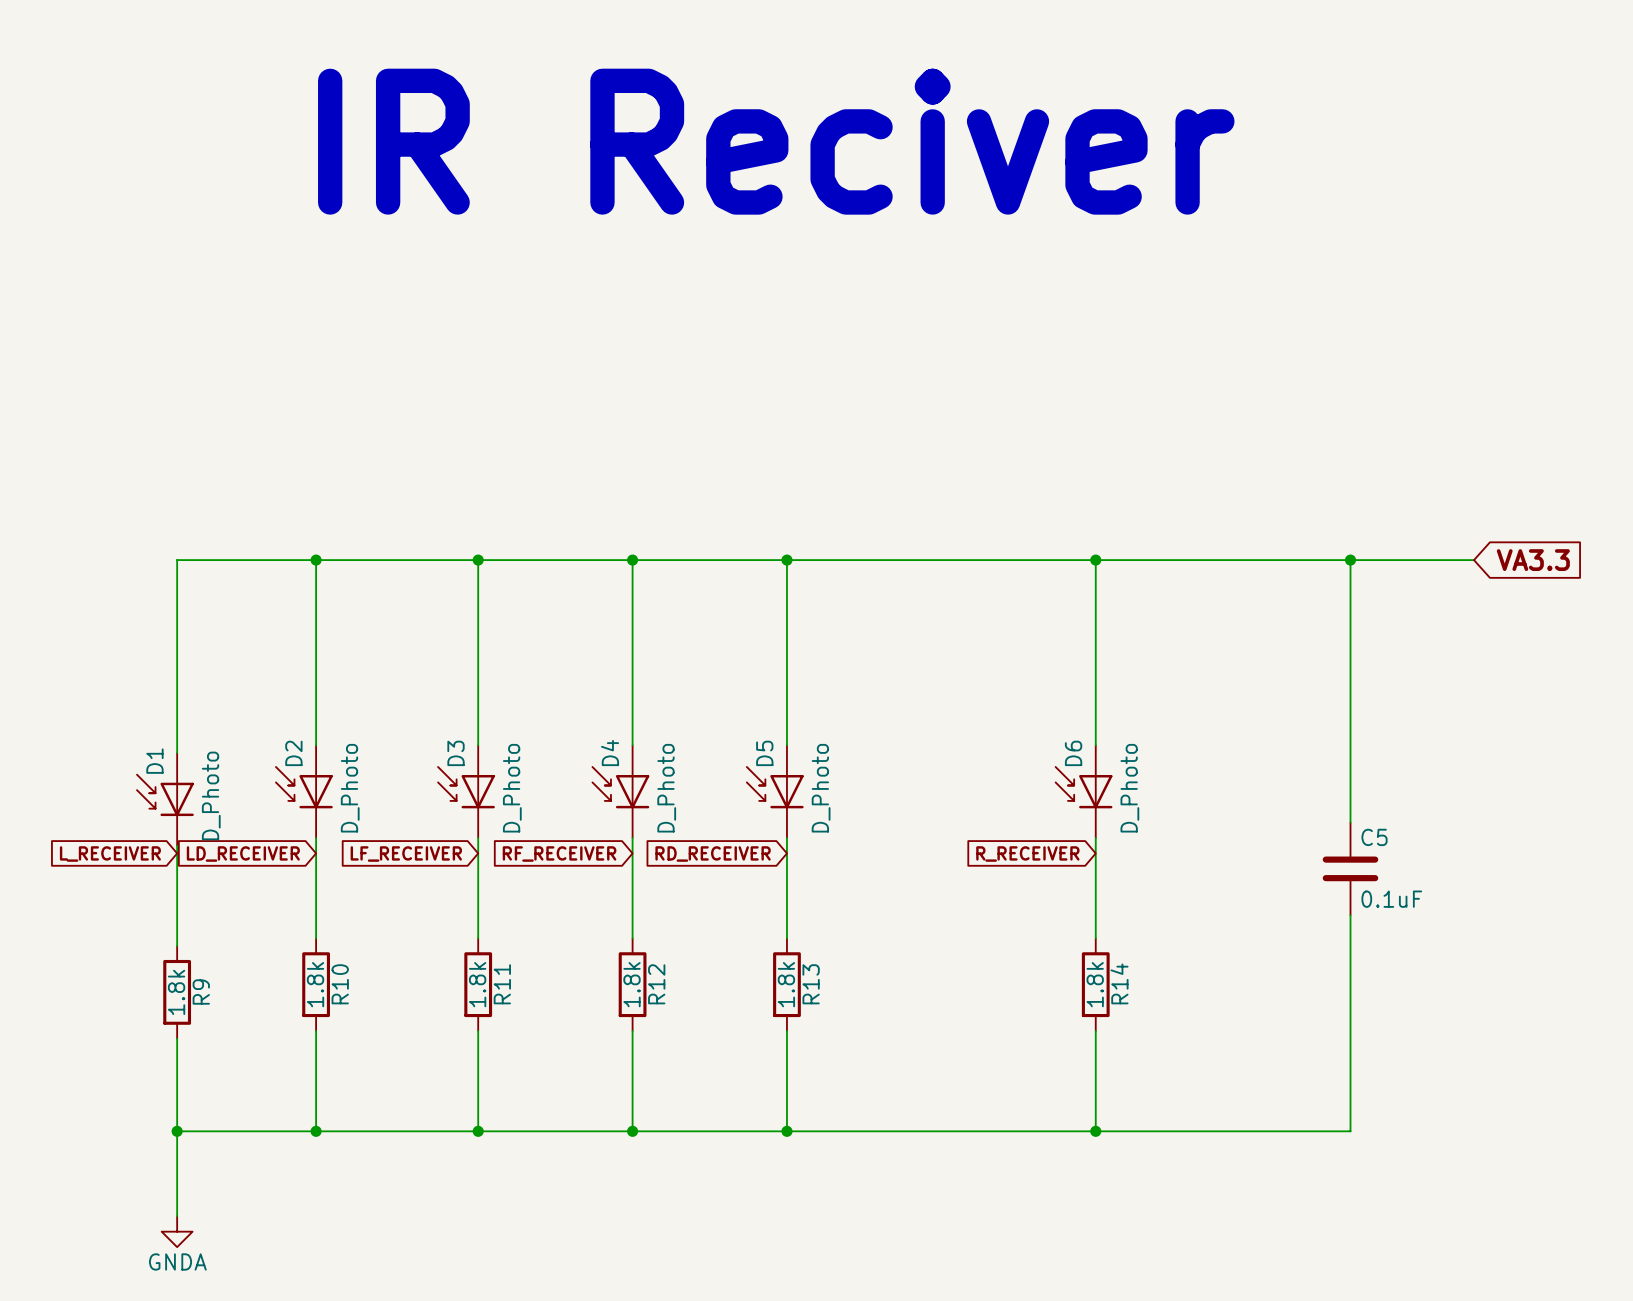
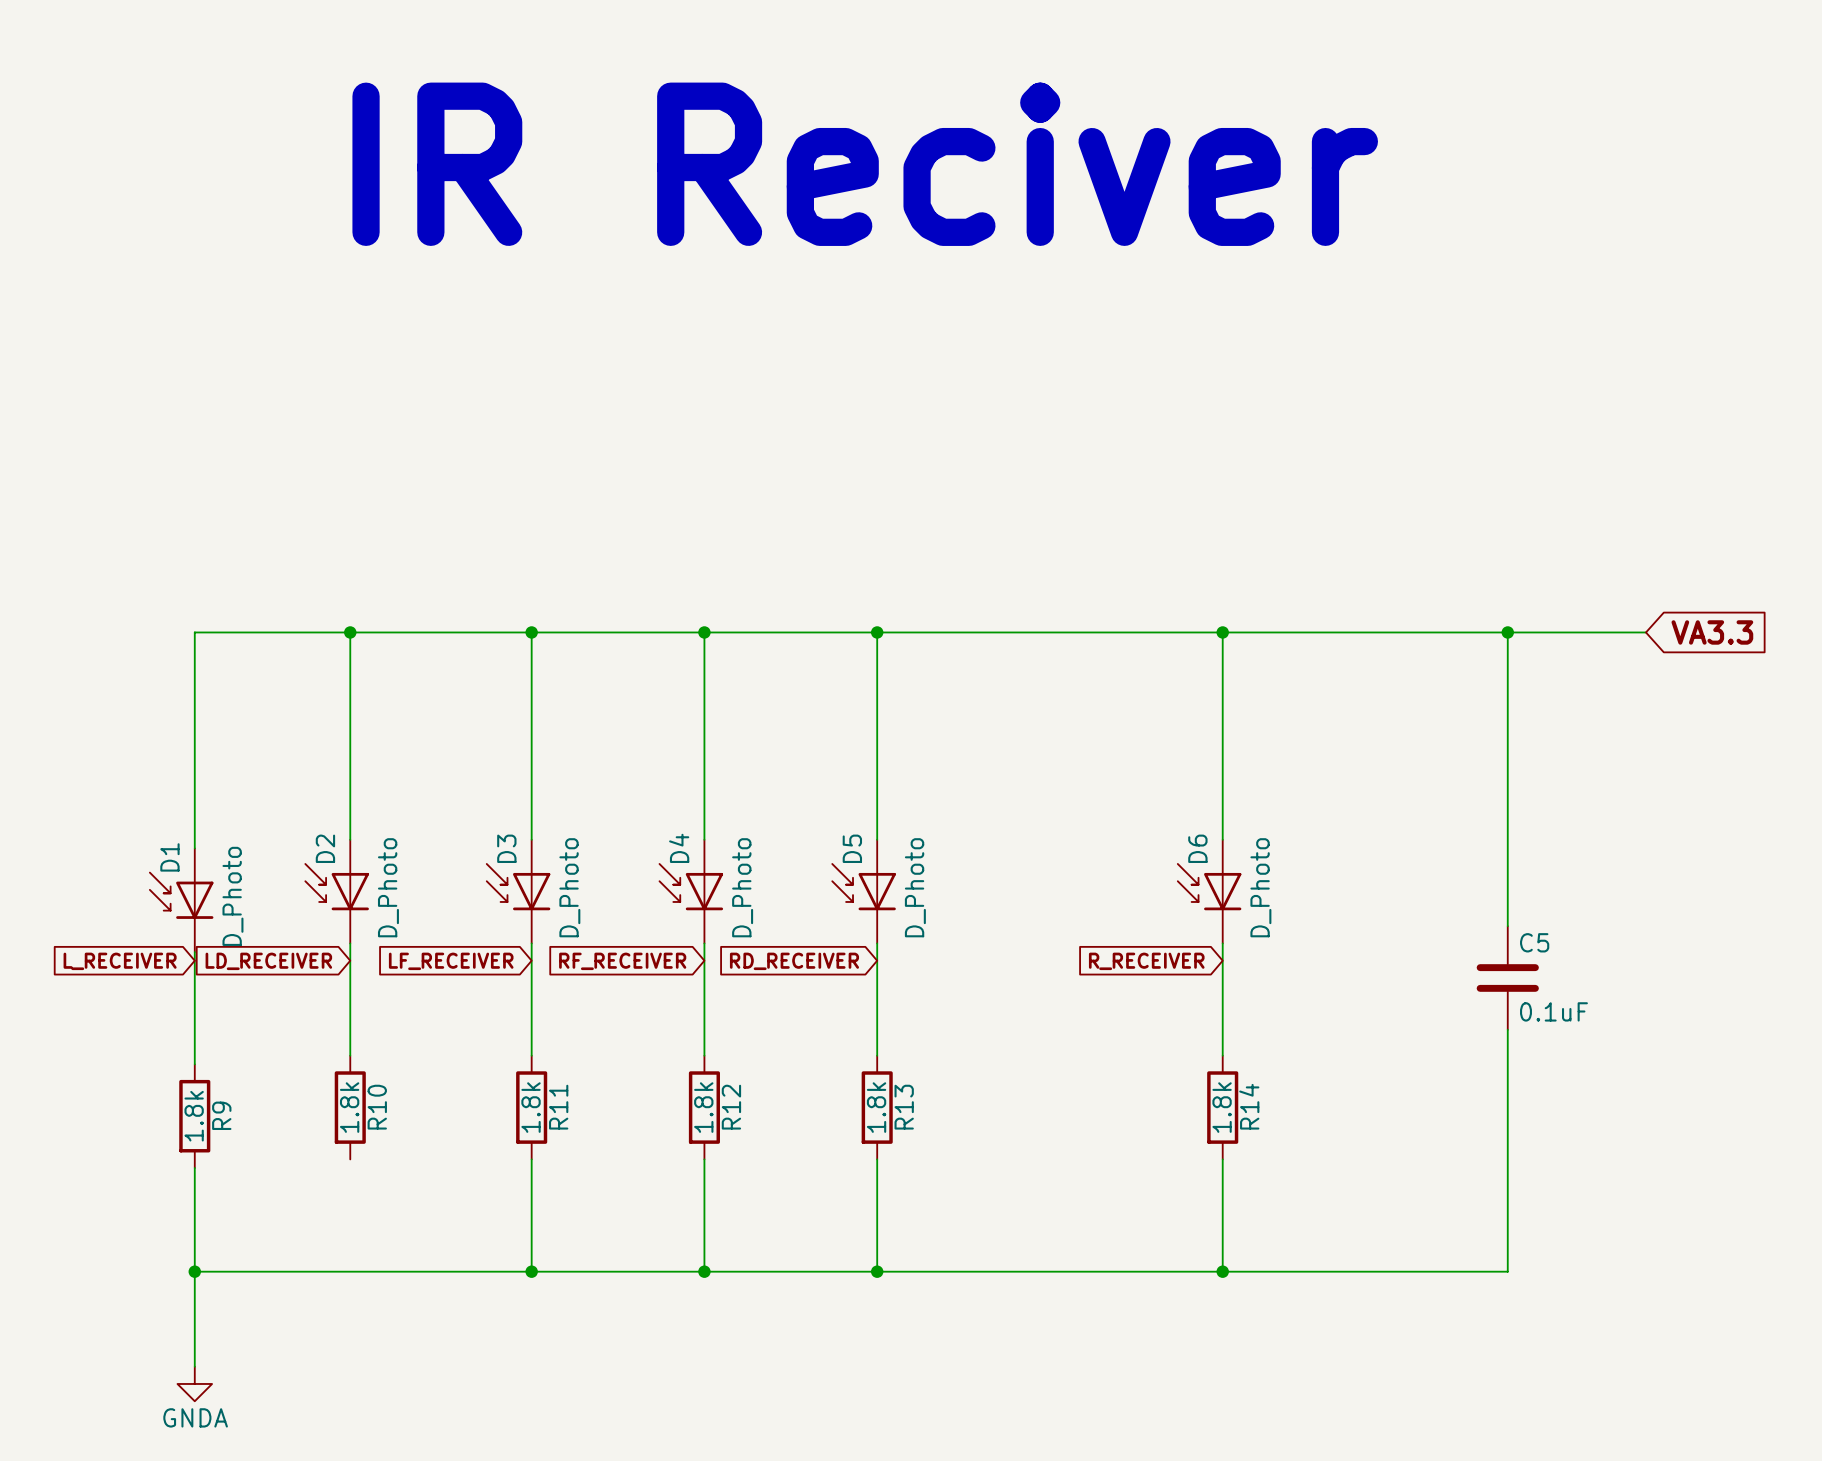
wire: (316, 1030) (316, 1131) -> none
junction: (316, 1131) -> none

